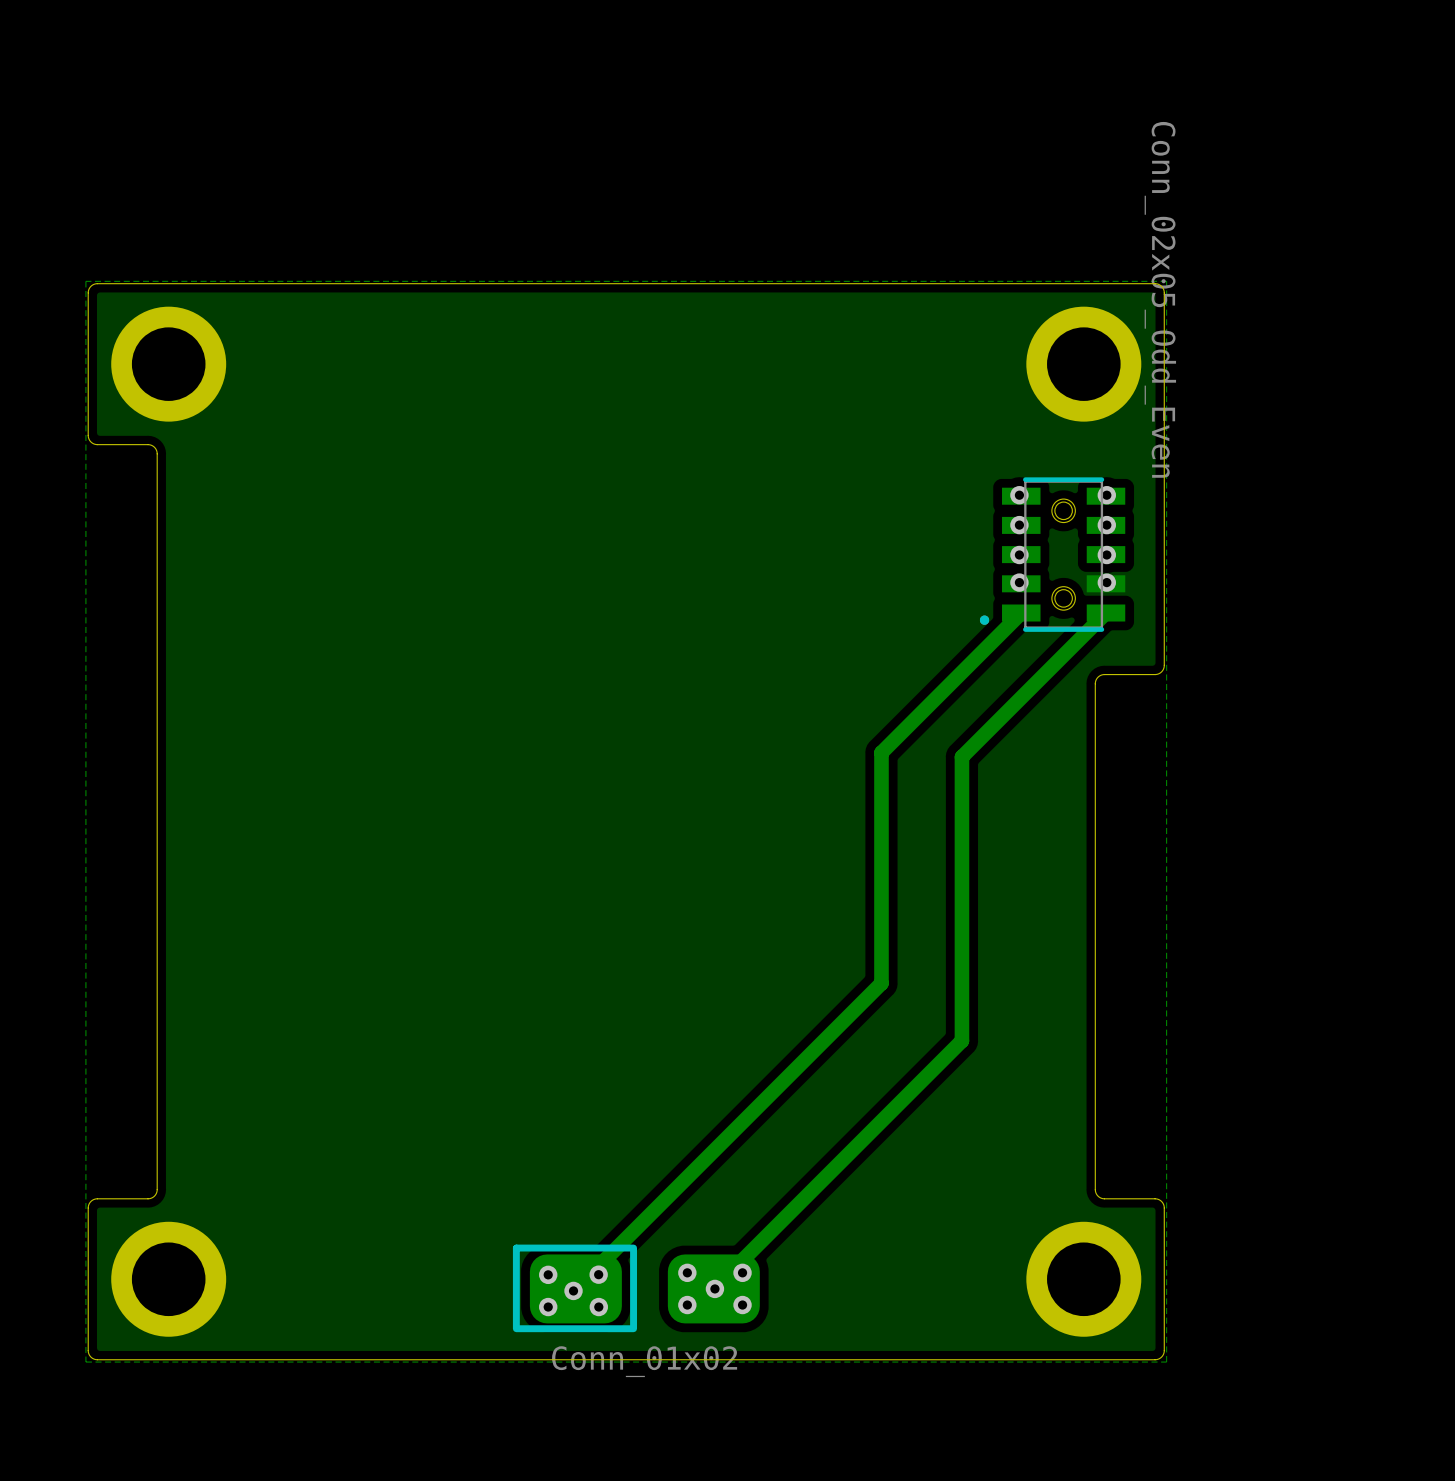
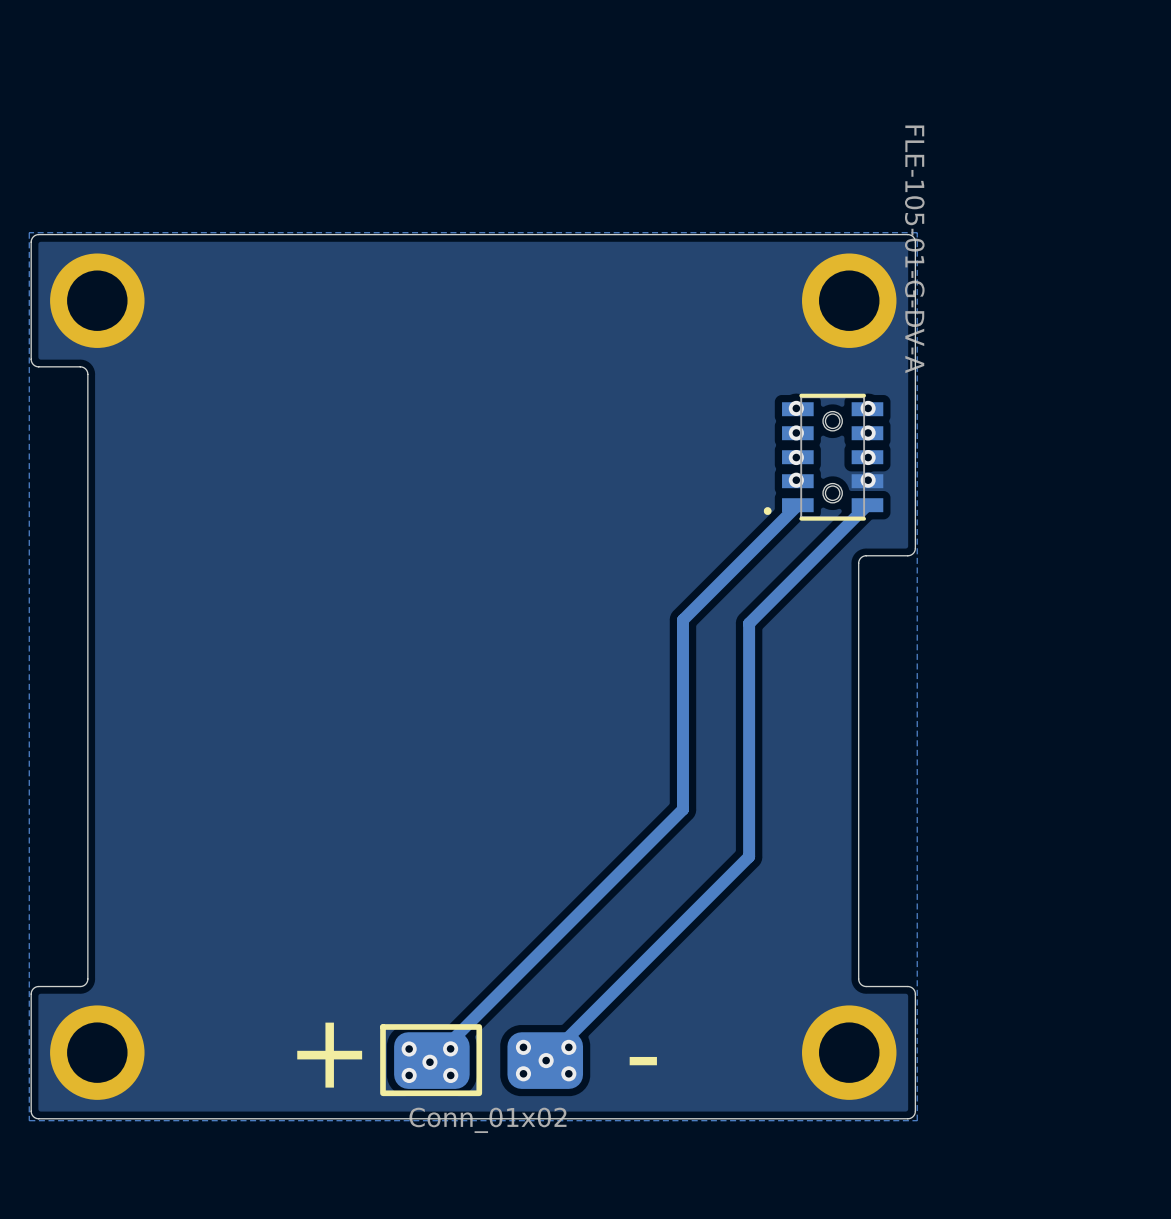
part value: Conn_02x05_Odd_Even (1160, 299) -> FLE-105-01-G-DV-A (914, 249)
text: none -> + (329, 1055)
text: none -> - (643, 1061)

